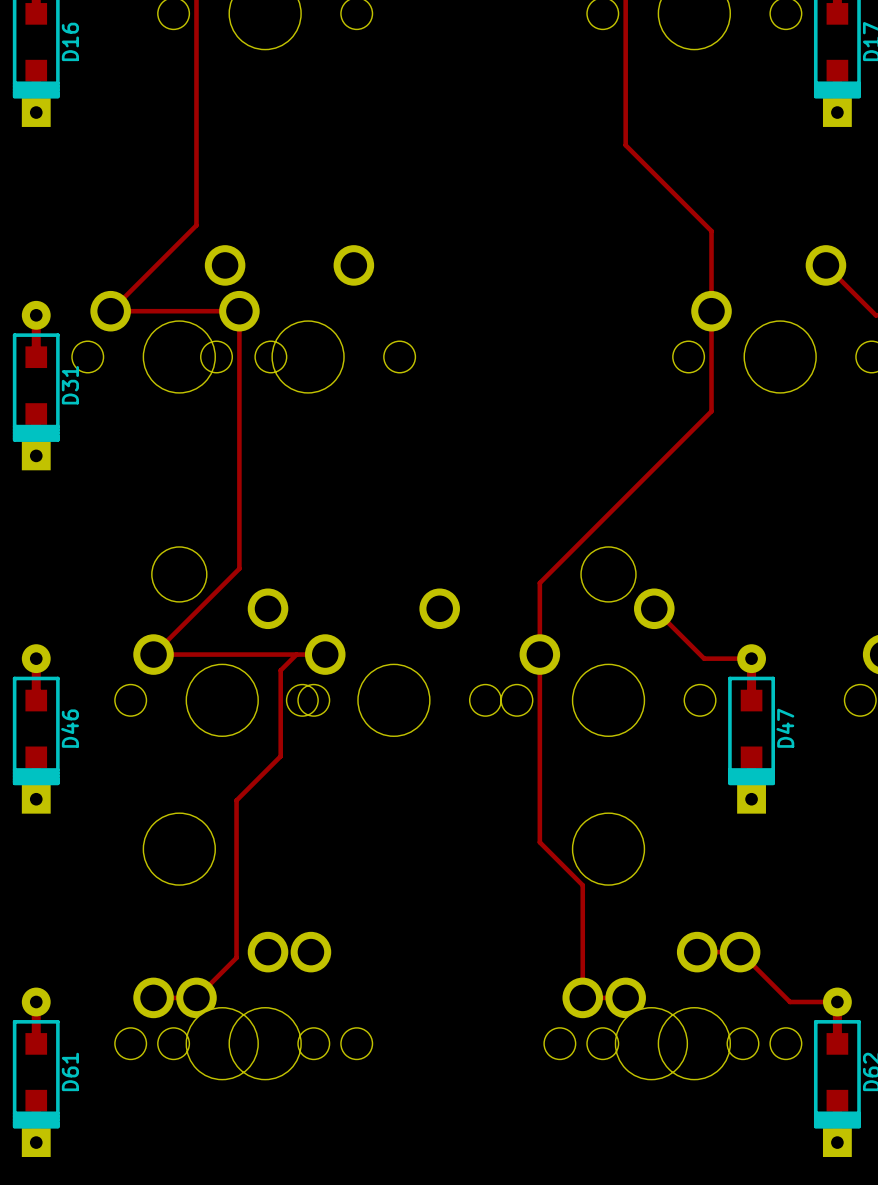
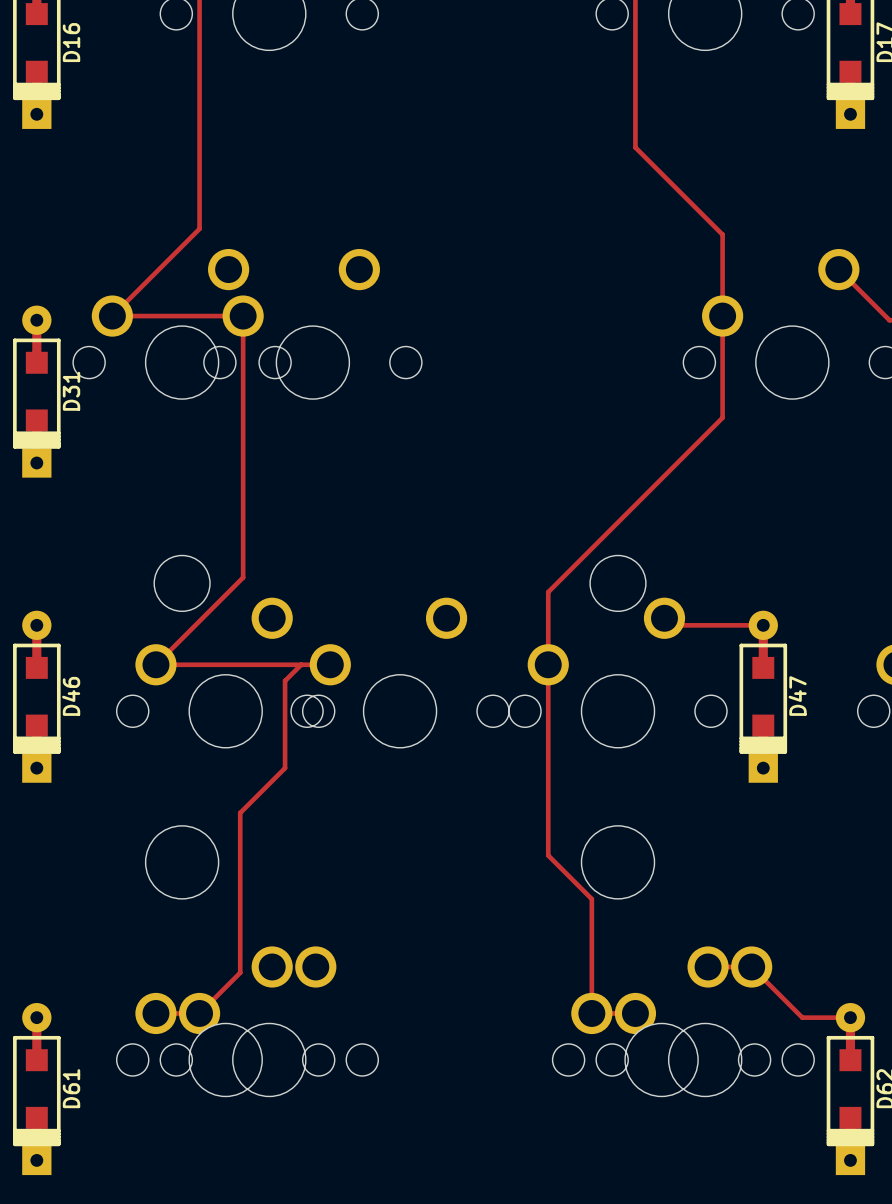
track: (661, 615) (704, 658) (751, 658) -> (671, 625) (763, 625)
D46 position: (36, 728) -> (36, 696)
D47 position: (751, 728) -> (763, 696)

